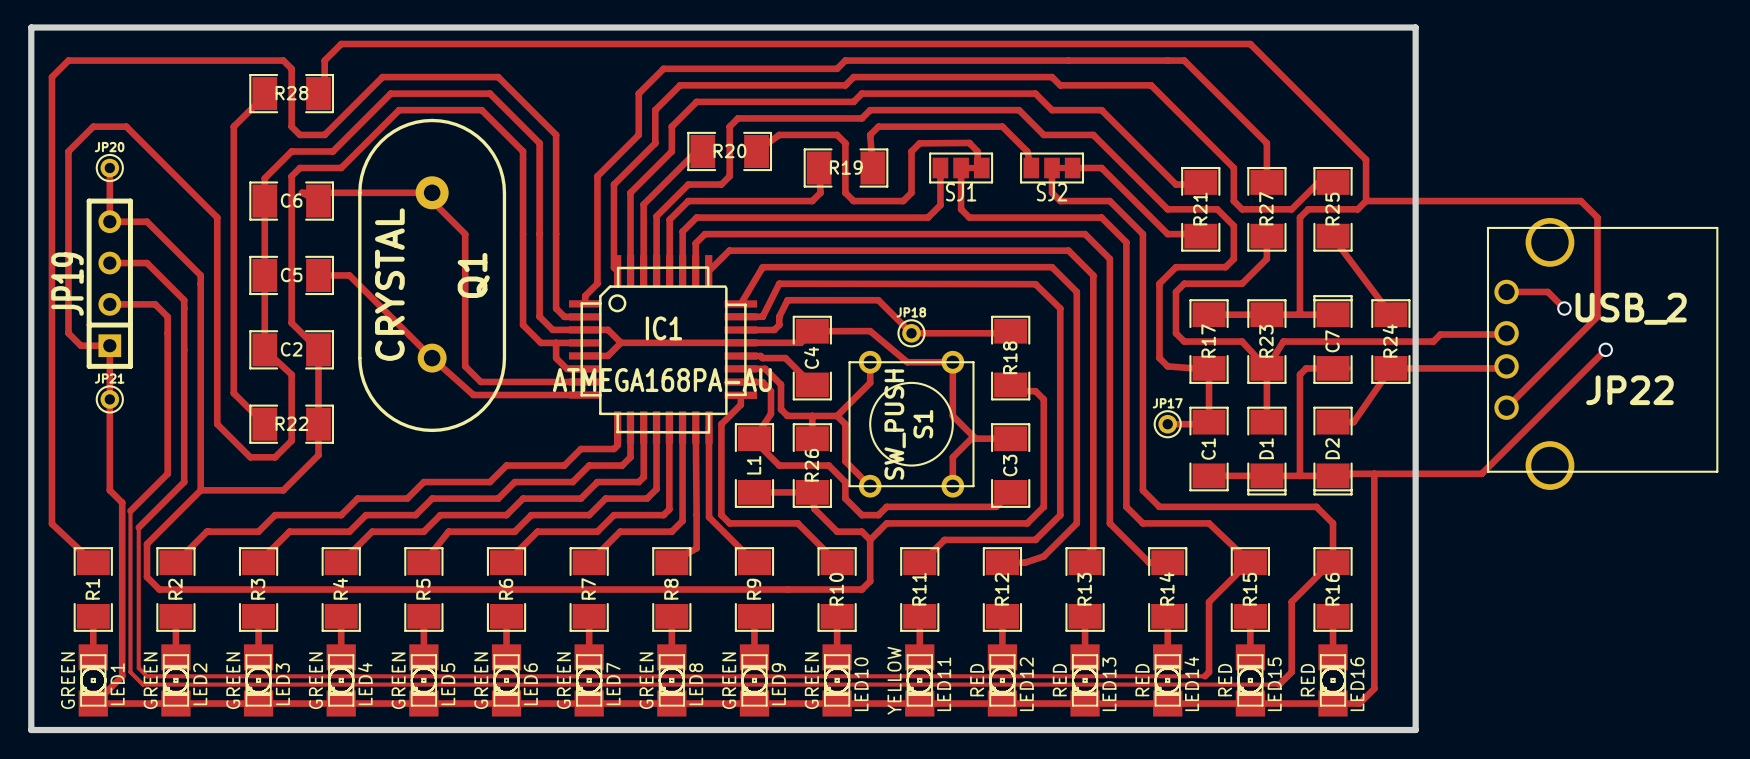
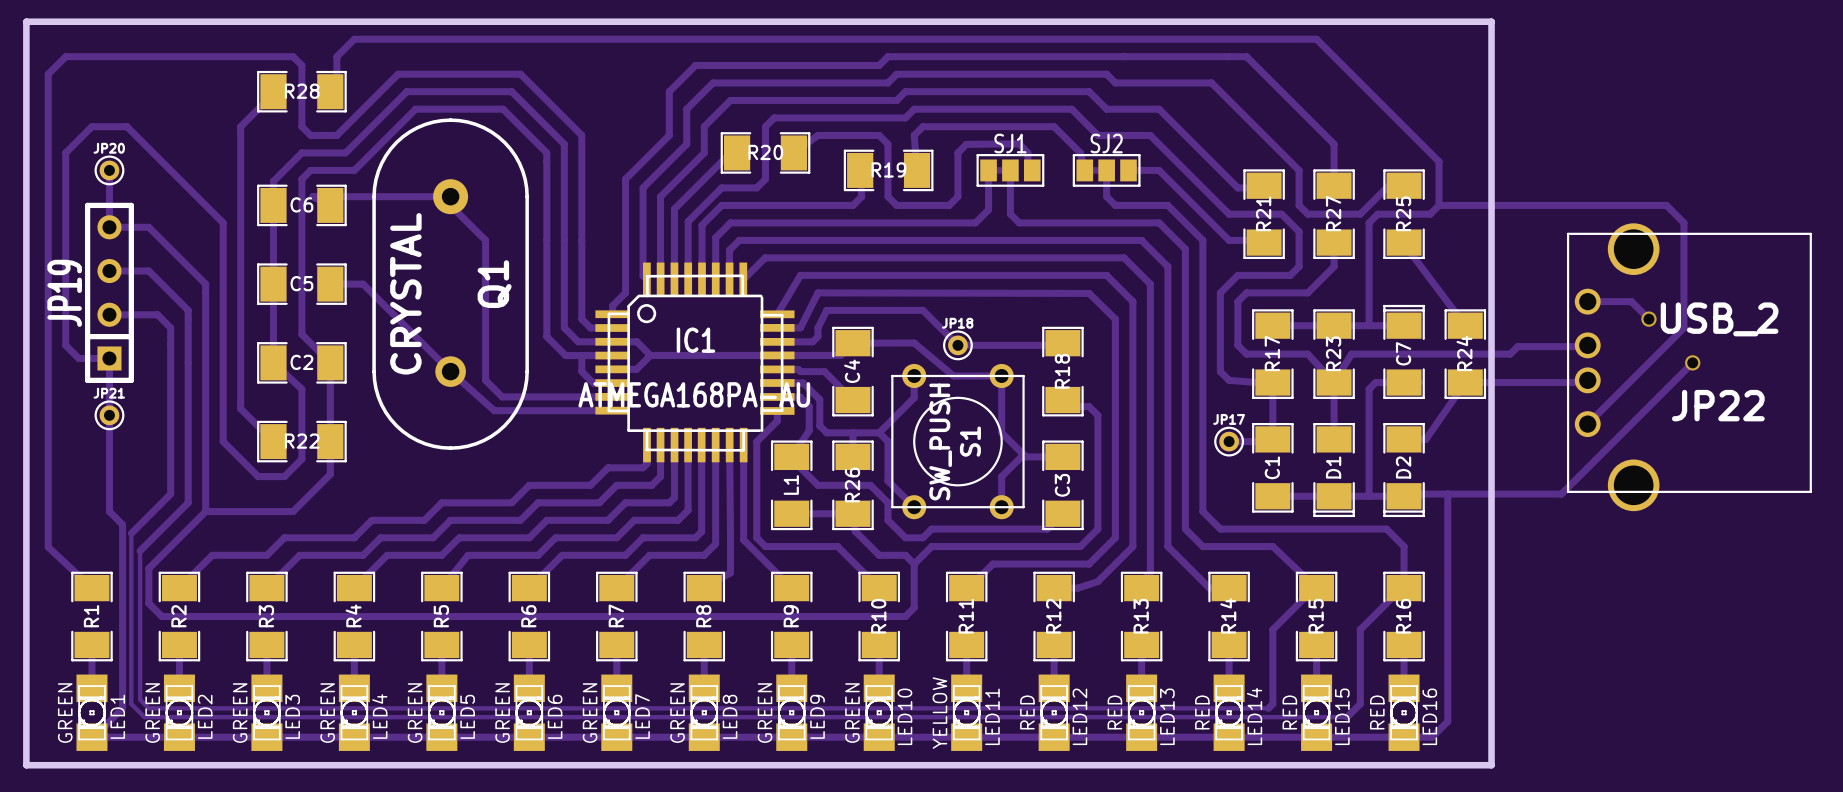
SJ1 rotation: 0° (961, 168) -> 180° (1010, 170)
SJ2 rotation: 0° (1052, 168) -> 180° (1106, 170)

